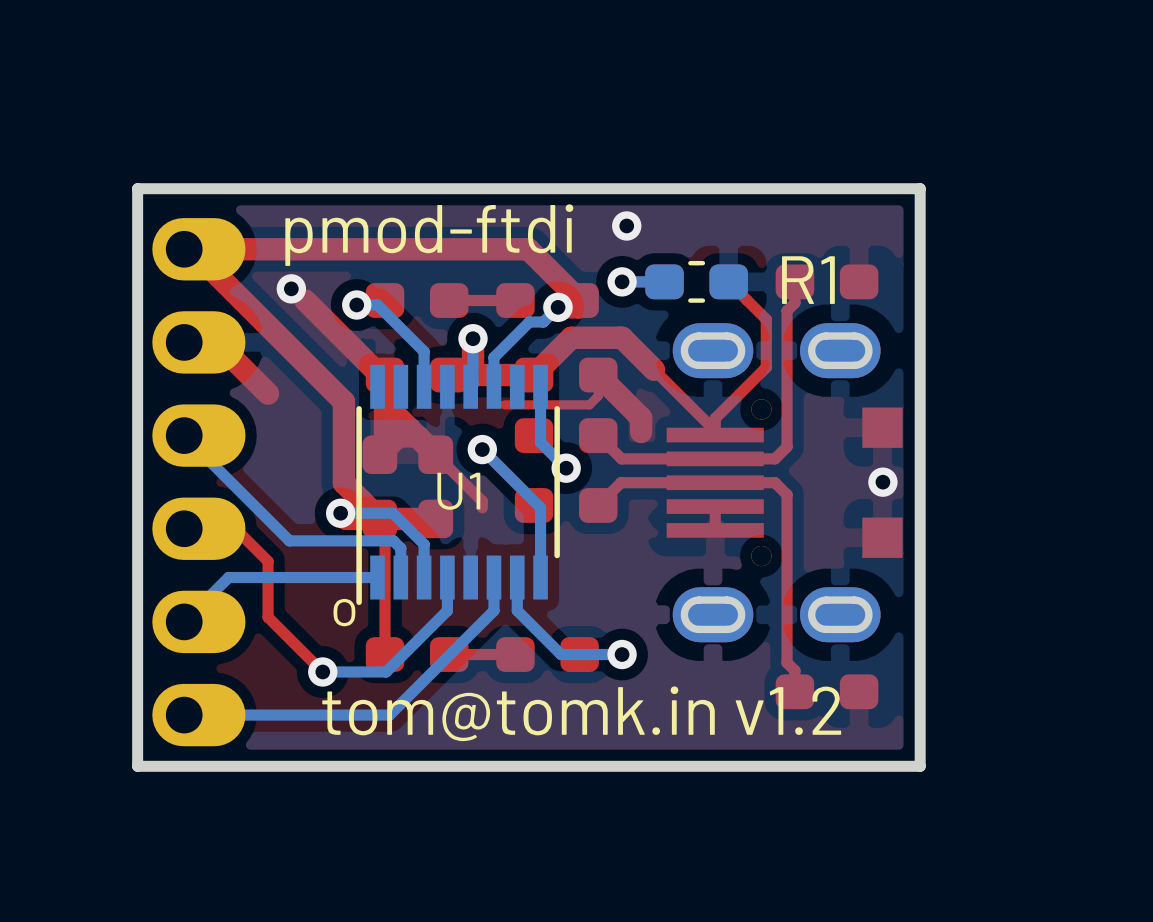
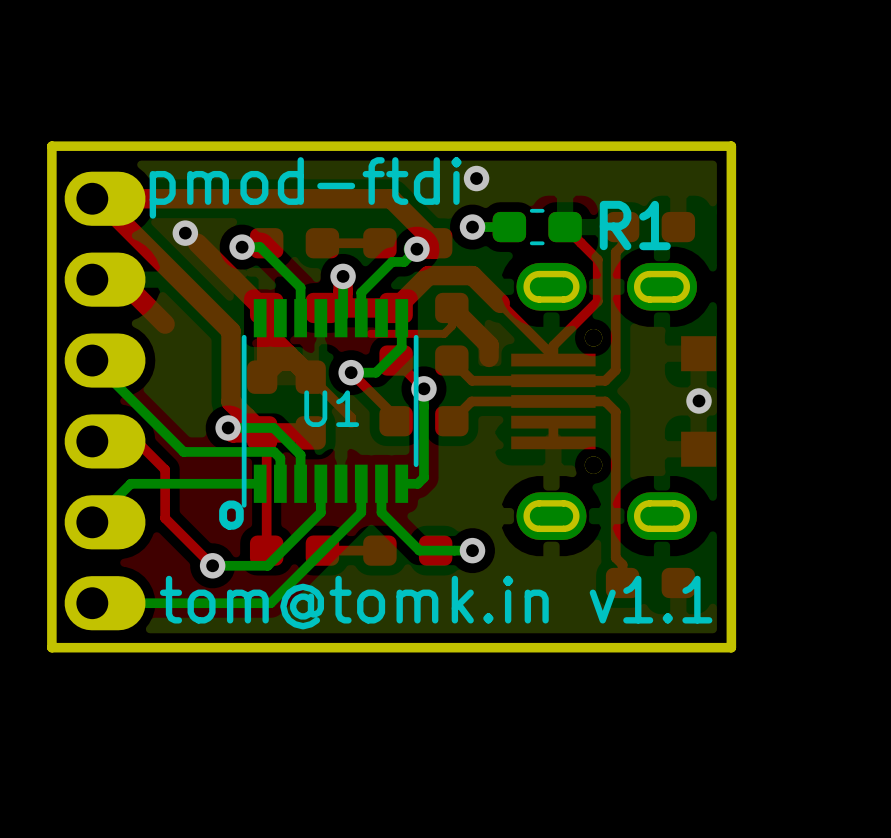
bottom track: (540, 419) (540, 442) (566, 468) -> (401, 346) (376, 372) (351, 372)
bottom track: (482, 449) (540, 507) (540, 577) -> (423, 388) (423, 477) (417, 483) (401, 483)
text: tom@tomk.in v1.2 (581, 713) -> tom@tomk.in v1.1 (436, 602)

